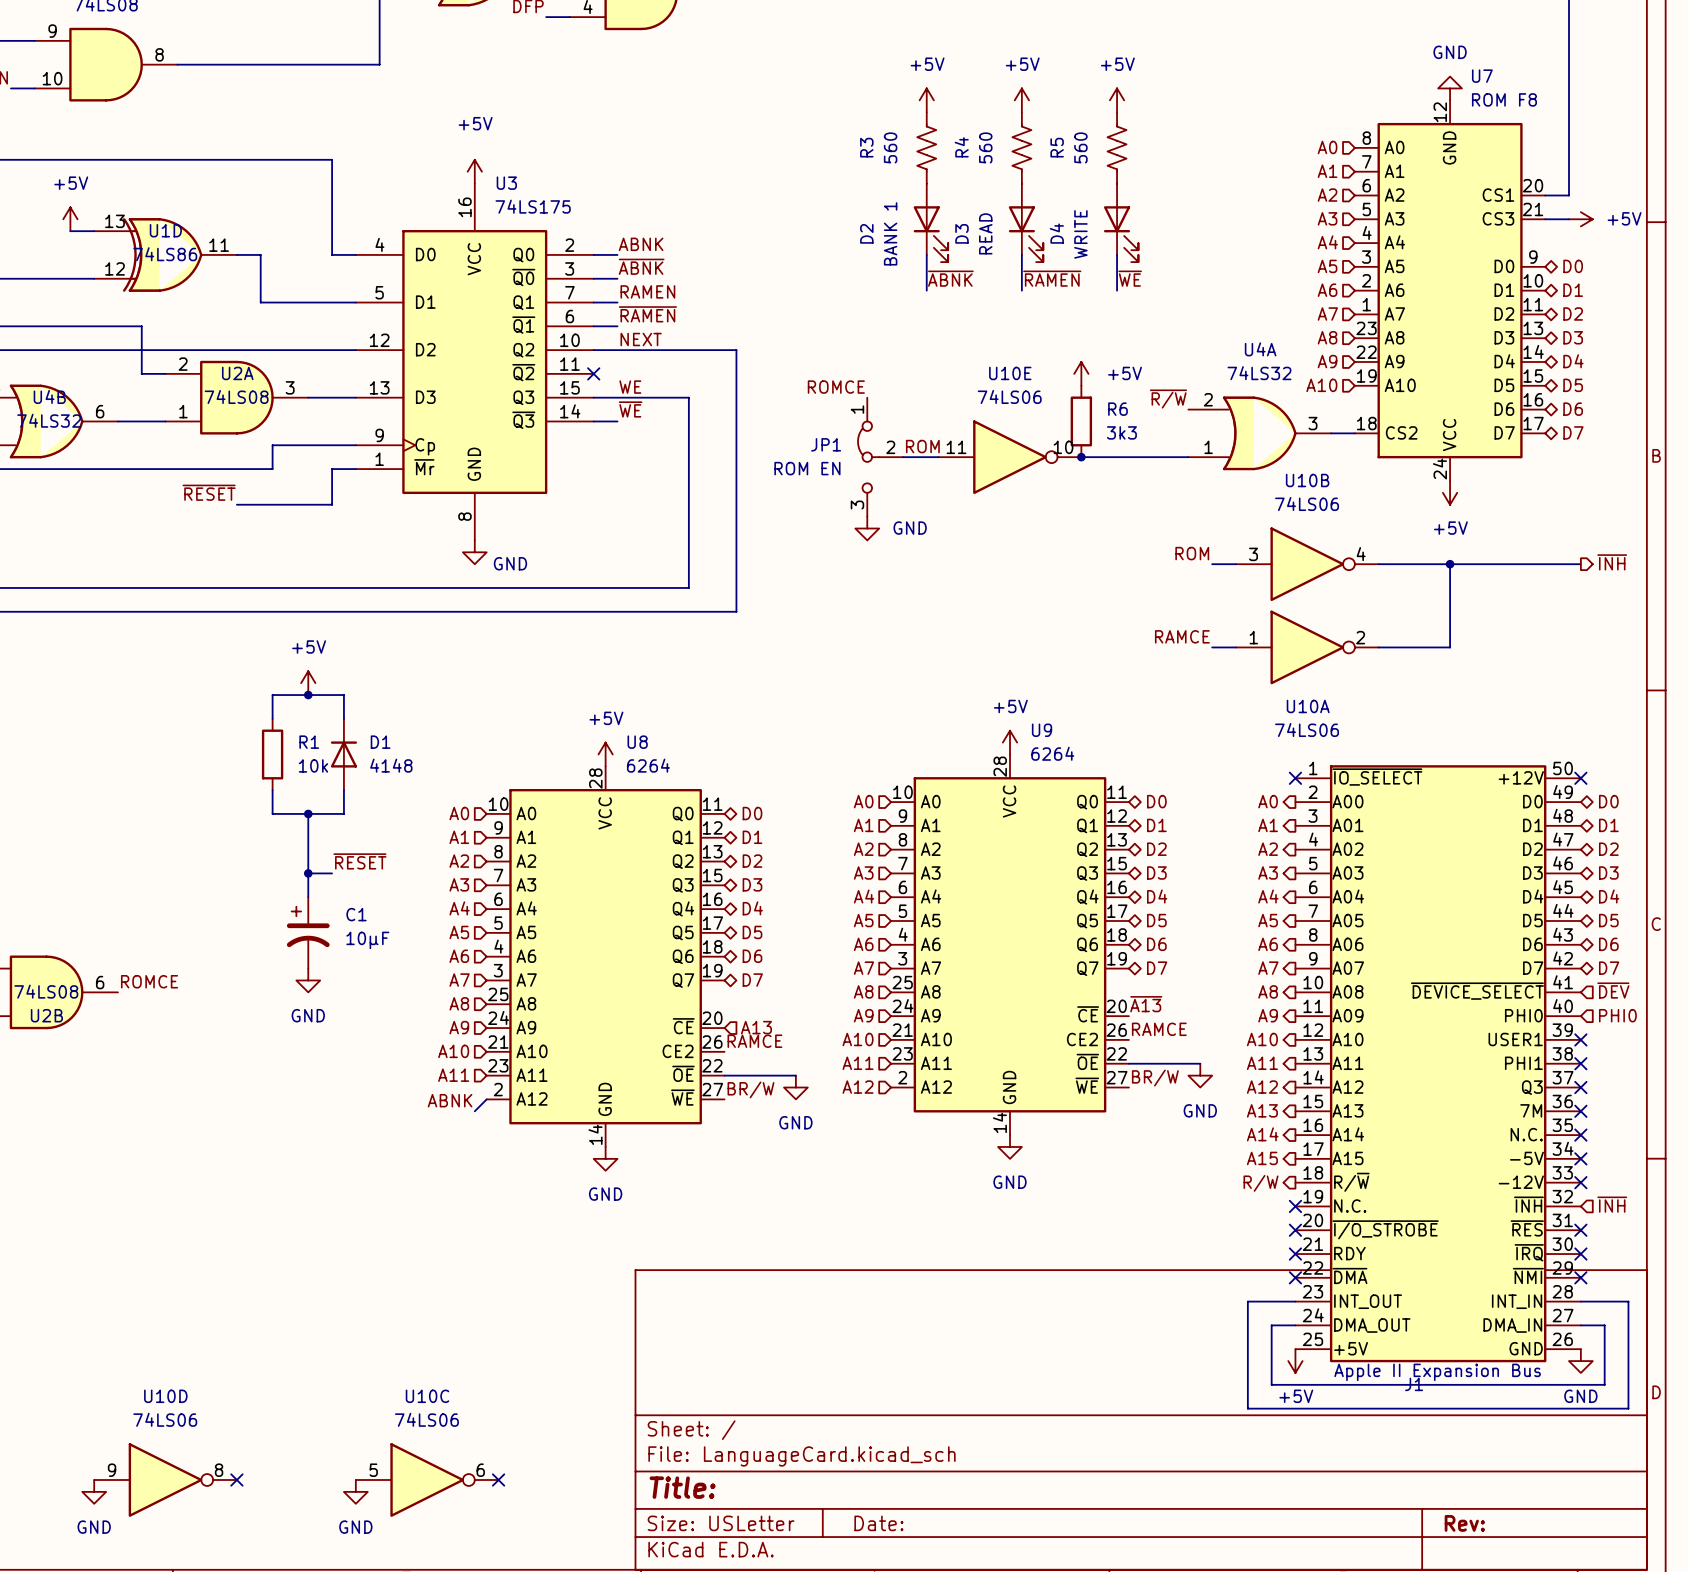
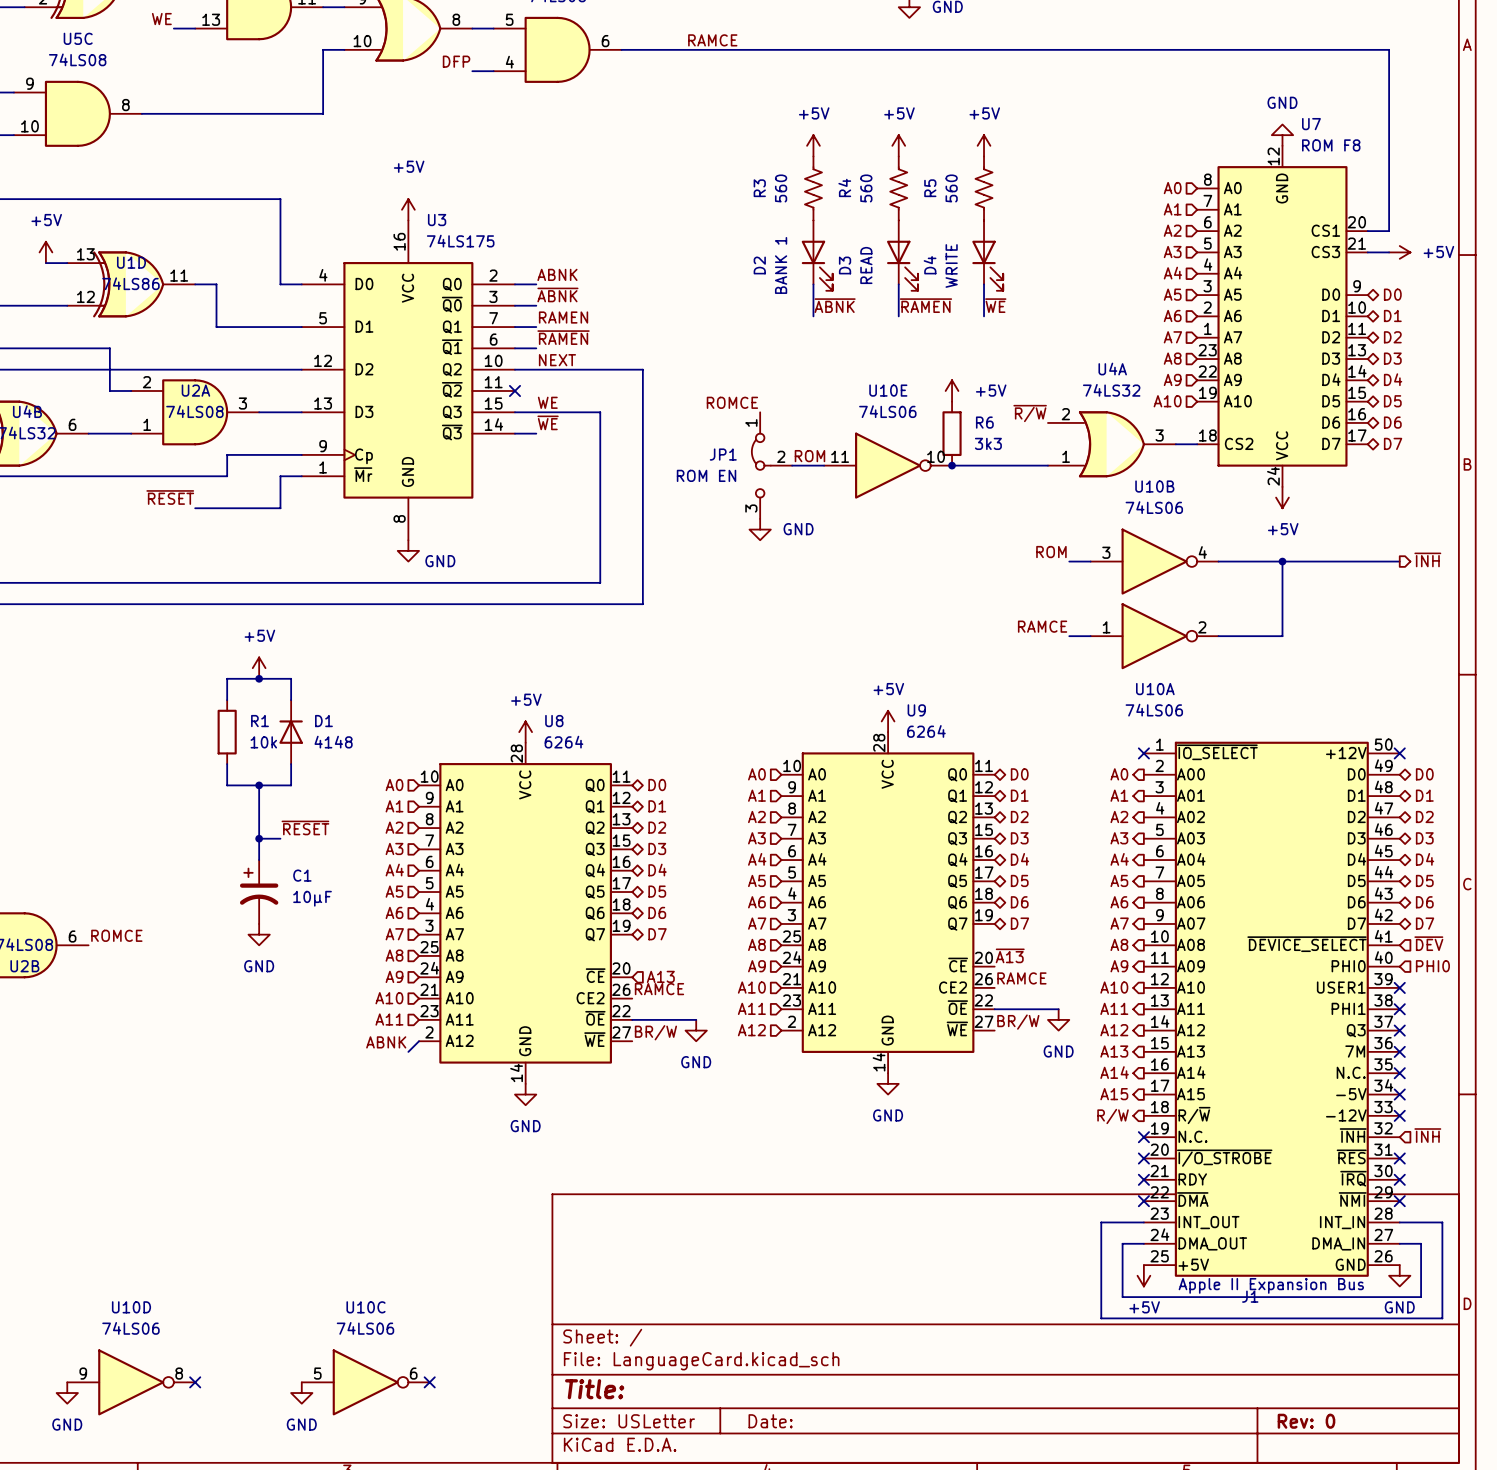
title block: Rev: (1464, 1523) -> Rev: 0 (1306, 1421)

